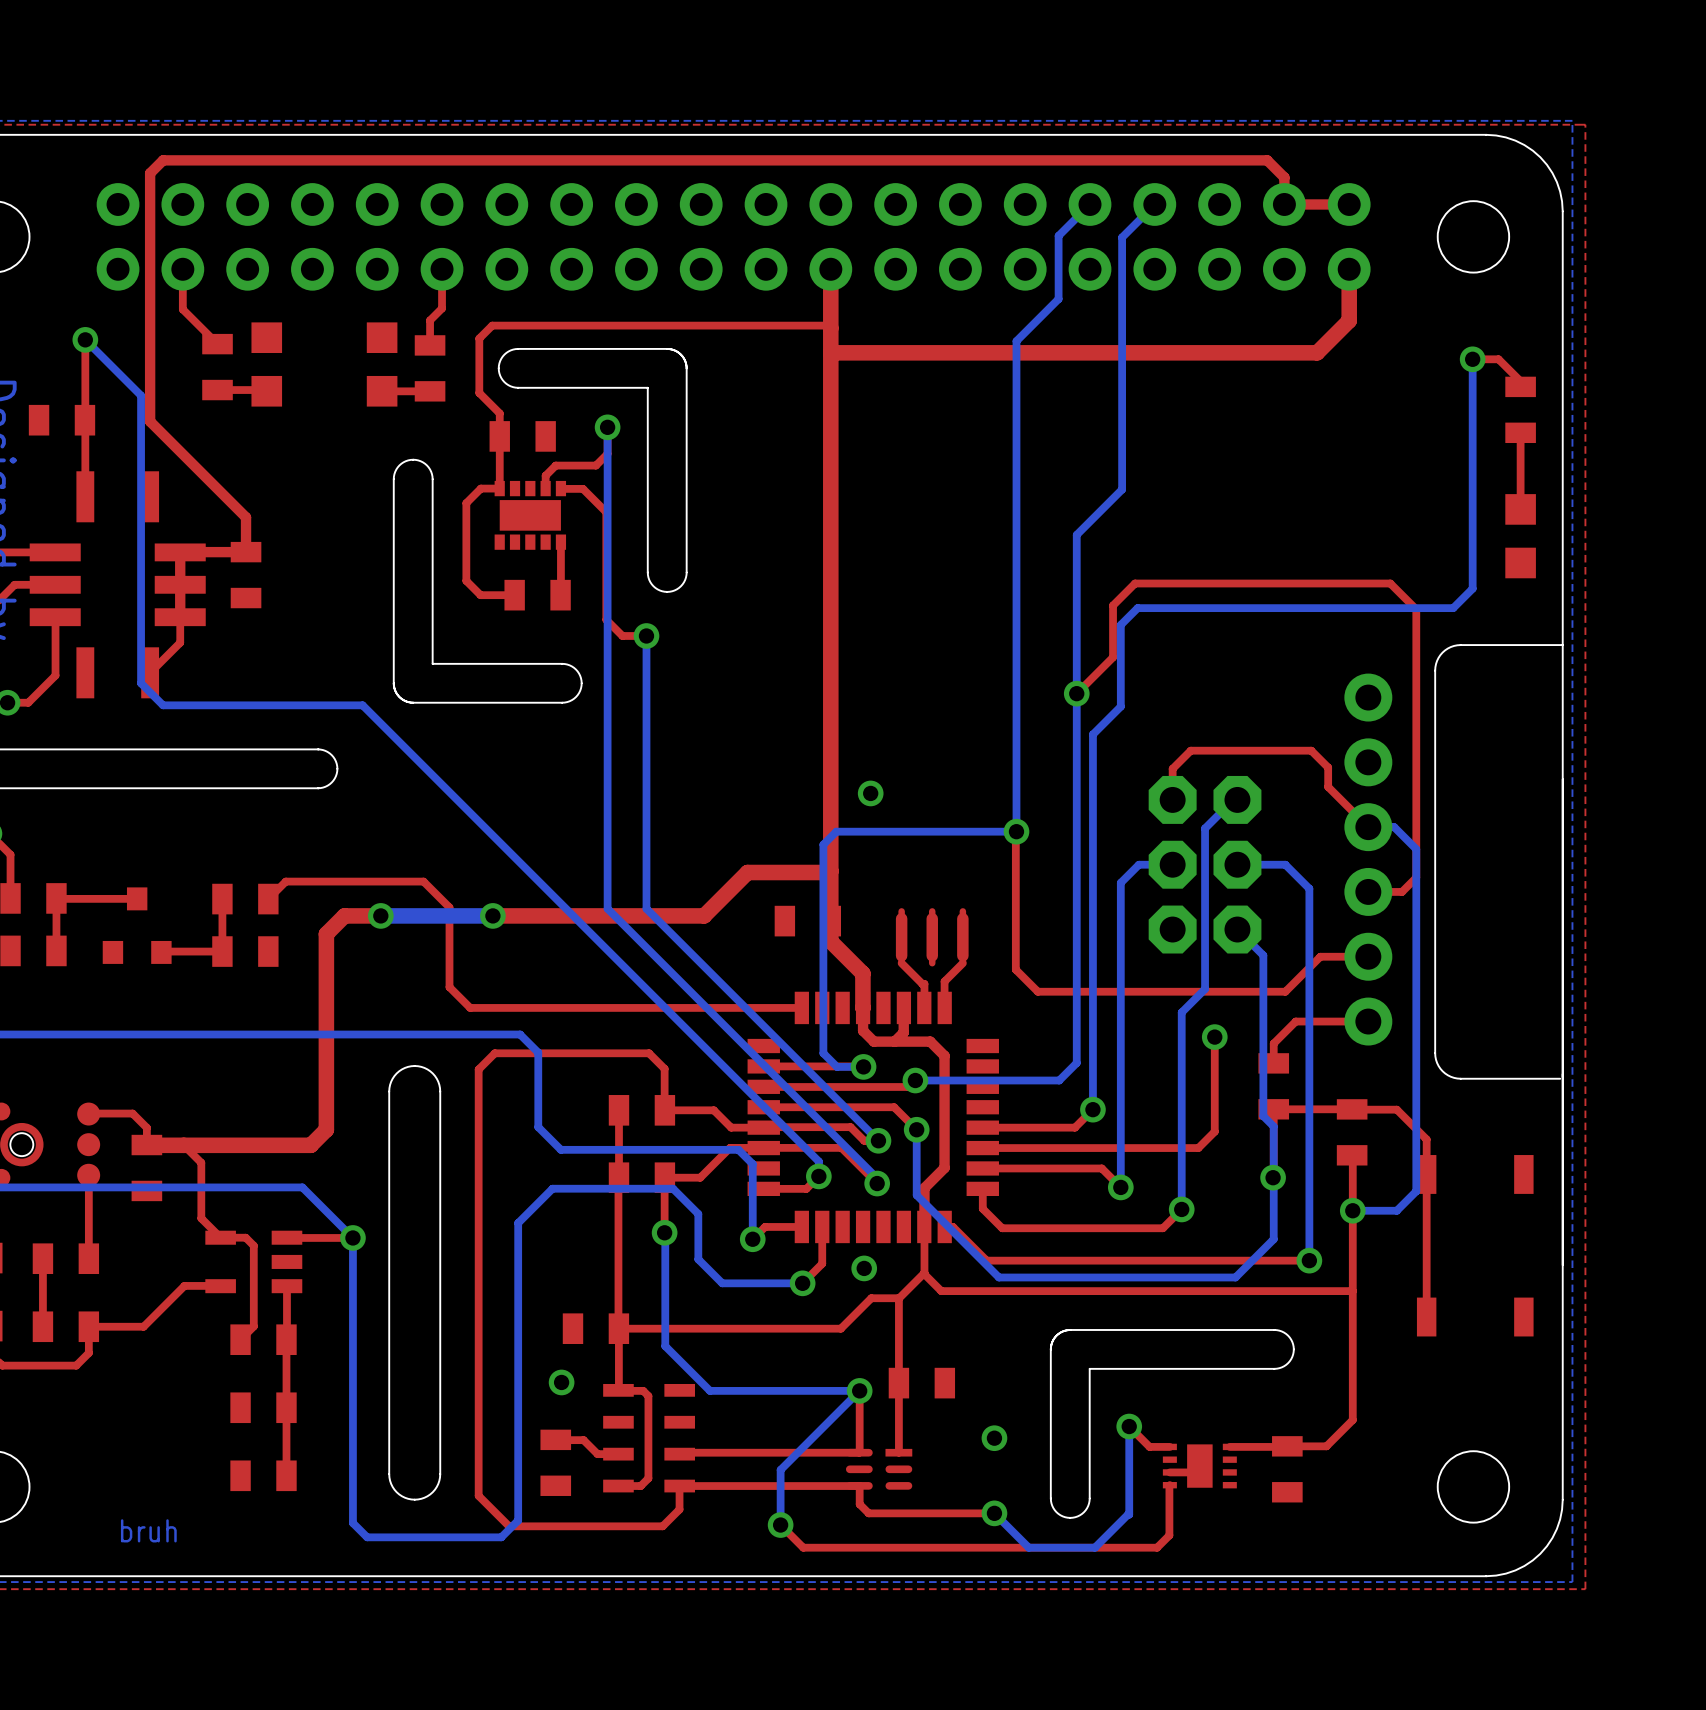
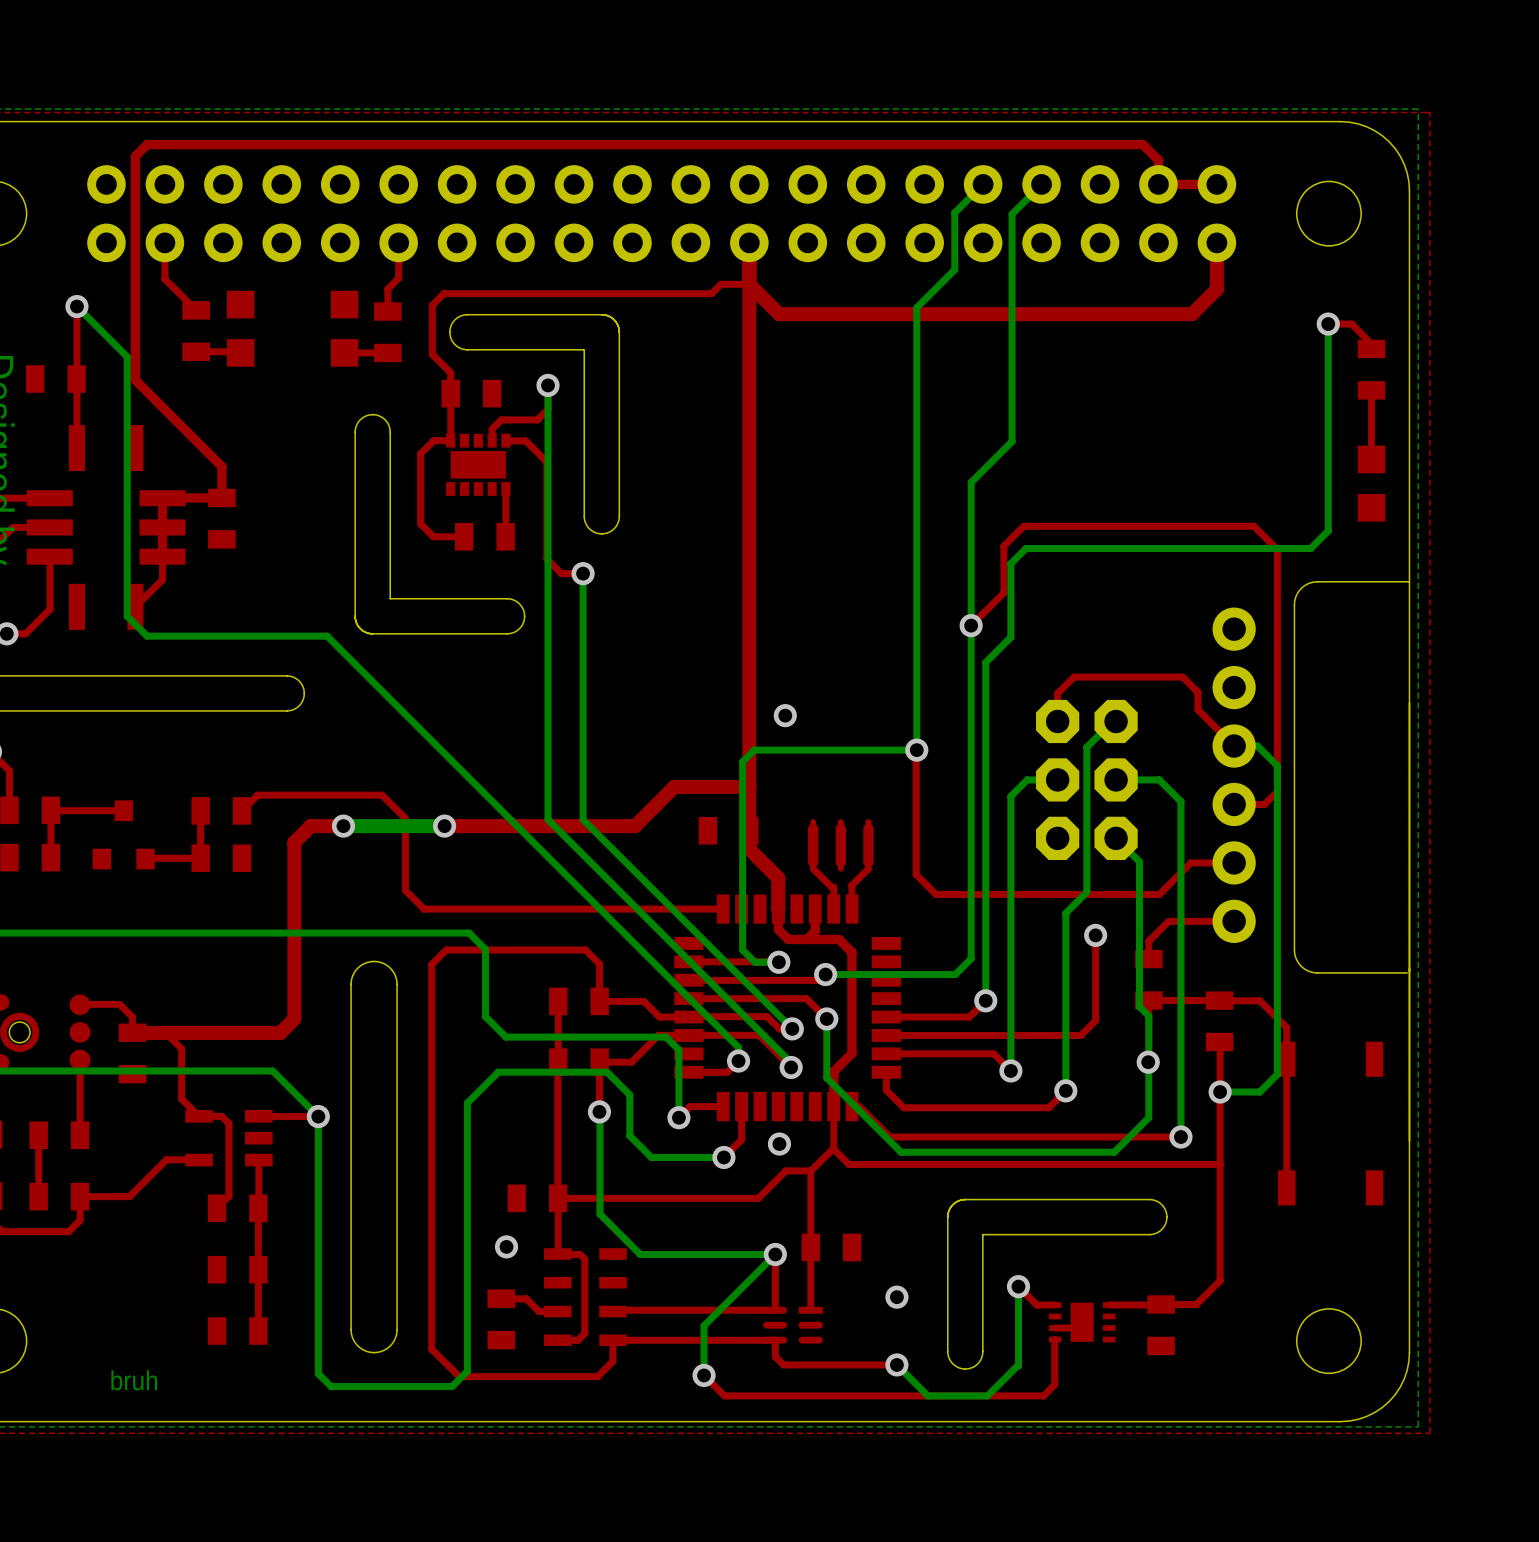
top track: (789, 325) (828, 325) (830, 328) -> none
top track: (1321, 348) (1317, 352) (830, 352) -> (1192, 314) (779, 314) (749, 284) (721, 284) (711, 293)

